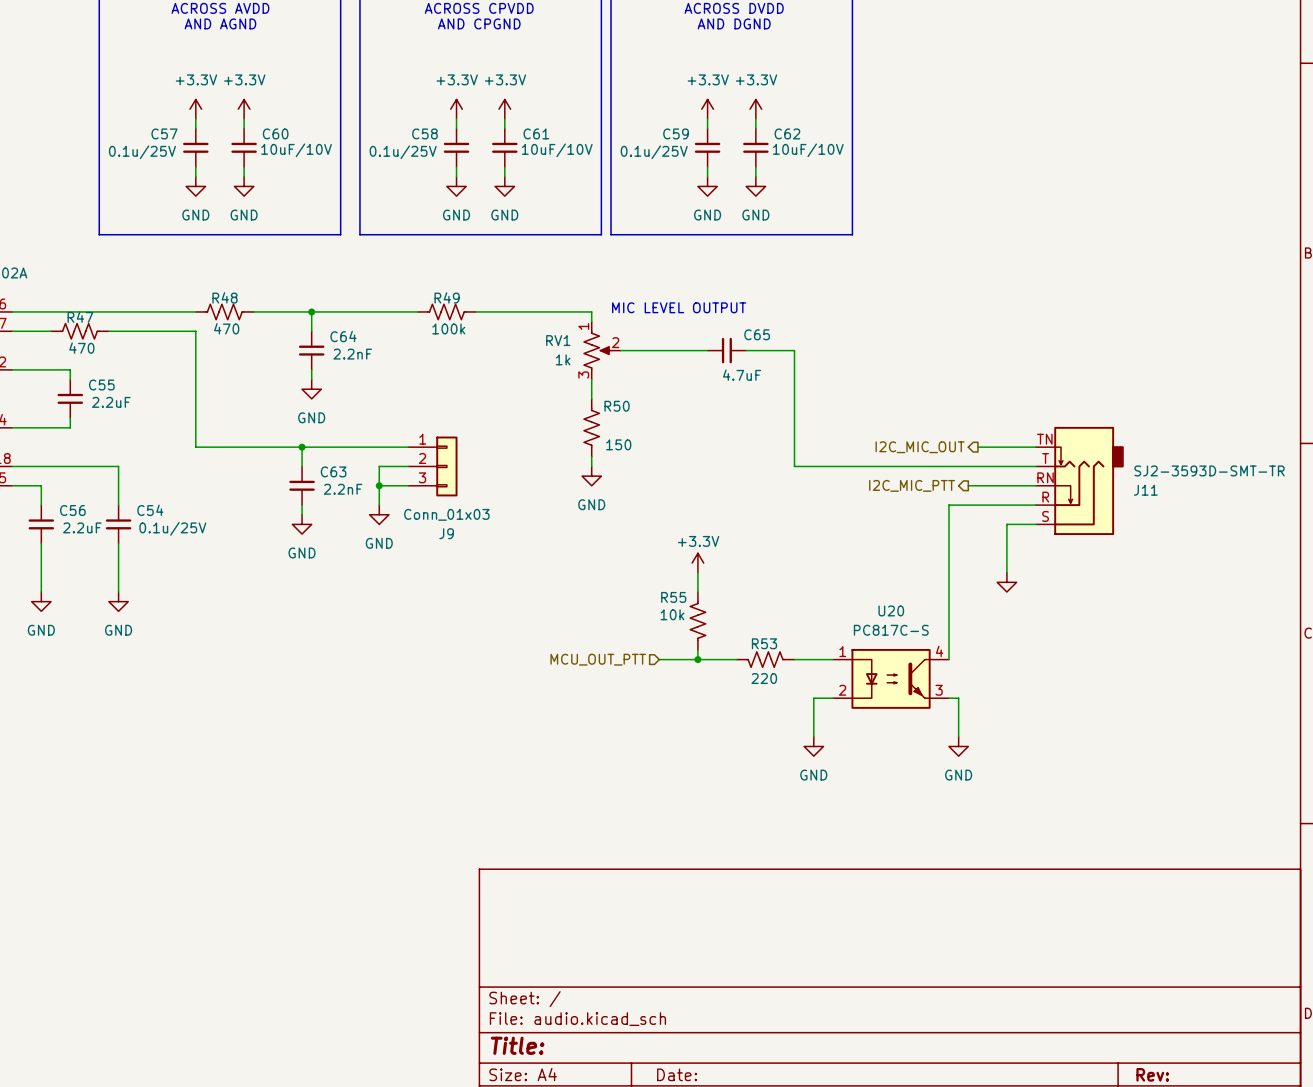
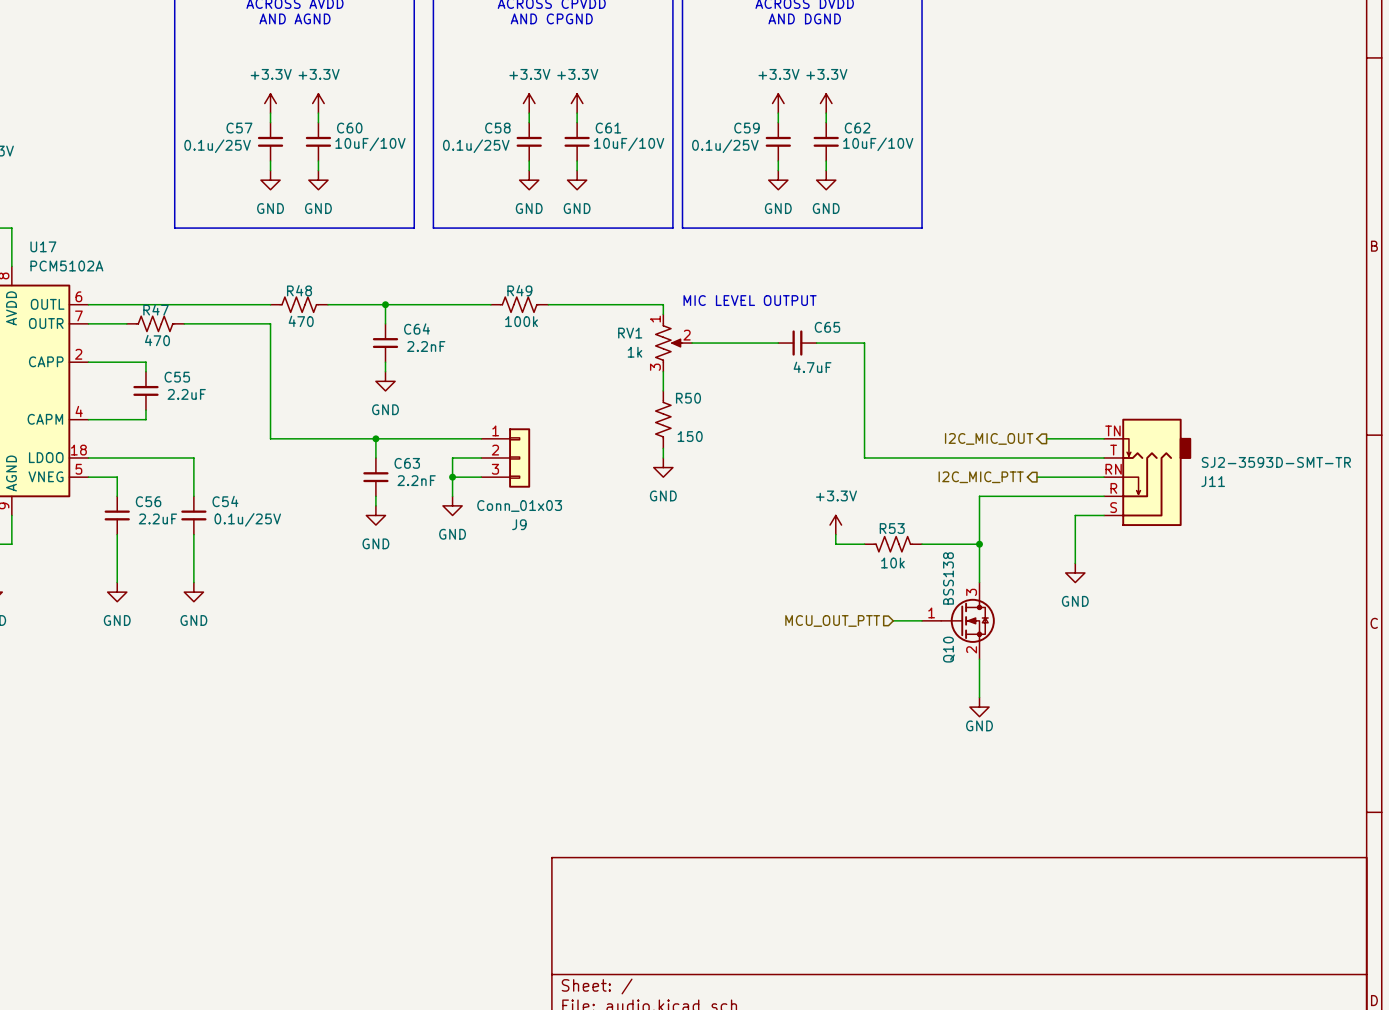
wire: (948, 505) (948, 659) -> (1017, 496) (979, 496) (979, 582)
power symbol text position: +3.3V (698, 541) -> +3.3V (836, 495)
wire: none -> (835, 534) (835, 544) (864, 544)
wire: none -> (922, 544) (979, 544)
junction: none -> (979, 544)
power symbol position: +3.3V (697, 563) -> +3.3V (835, 525)
wire: (697, 572) (697, 592) -> none
power symbol text: none -> GND (1075, 601)
R55: 10k (697, 620) -> none
wire: none -> (893, 620) (922, 620)
Q10: none -> BSS138 (958, 620)
wire: (697, 649) (697, 659) -> none
hierarchical label position: MCU_OUT_PTT (598, 659) -> MCU_OUT_PTT (832, 620)
wire: (659, 659) (736, 659) -> none
junction: (697, 659) -> none
R53 position: (765, 659) -> (893, 544)
wire: (794, 659) (833, 659) -> none
R53 value: 220 (764, 678) -> 10k (892, 563)
U20: PC817C-S (891, 678) -> none
wire: (833, 698) (813, 698) (813, 736) -> none
wire: (948, 698) (958, 698) (958, 736) -> none
power symbol: none -> GND (979, 707)
power symbol: GND (813, 746) -> none
power symbol: GND (958, 746) -> none

